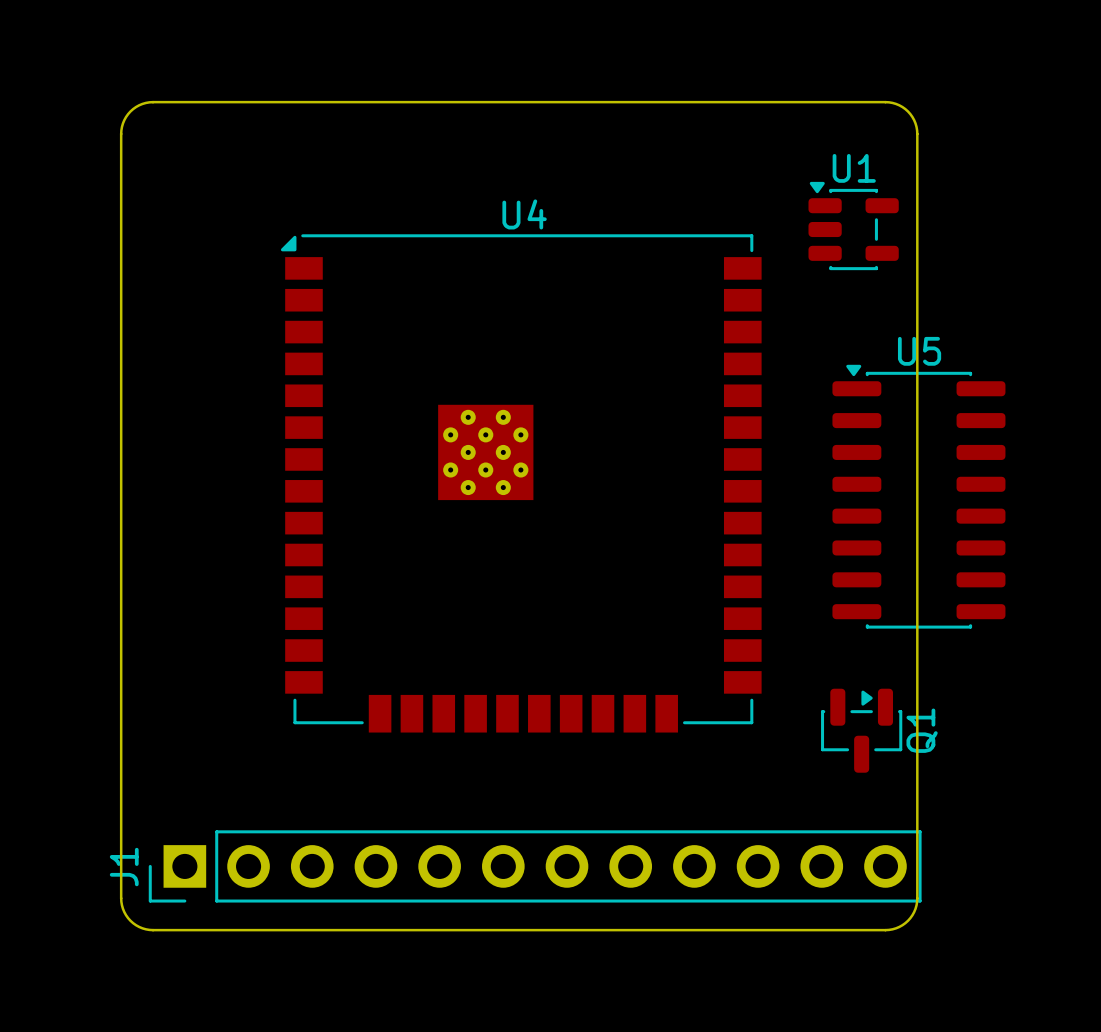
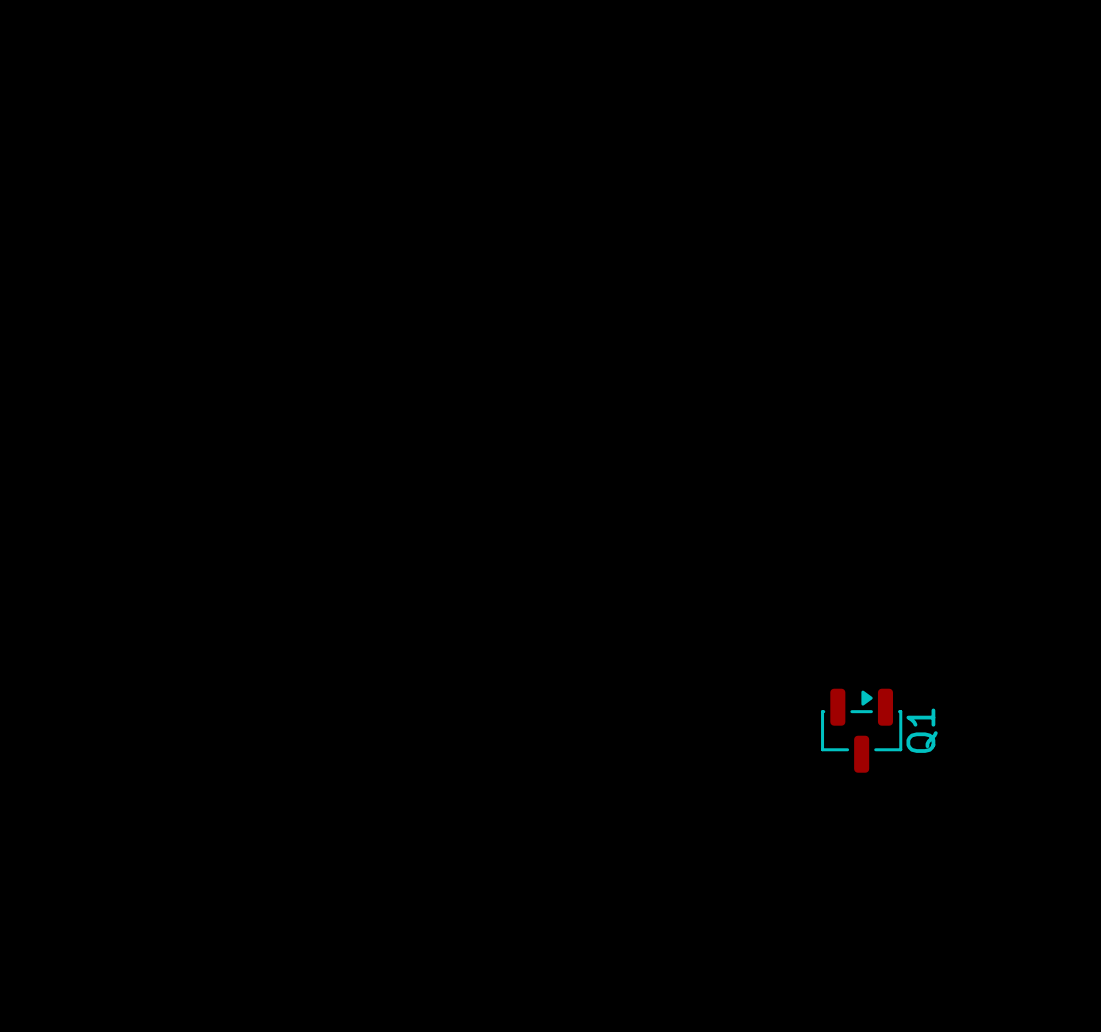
board edge: (153, 102) (885, 102) (895, 103) (907, 111) (915, 123) (917, 133) (917, 898) (915, 908) (907, 920) (895, 928) (885, 930) (153, 930) (139, 926) (130, 920) (124, 912) (121, 898) (121, 133) (122, 123) (130, 111) (142, 103) (153, 102) -> none
U1: (853, 226) -> none
U4: (521, 483) -> none
U5: (918, 496) -> none
J1: (535, 866) -> none

